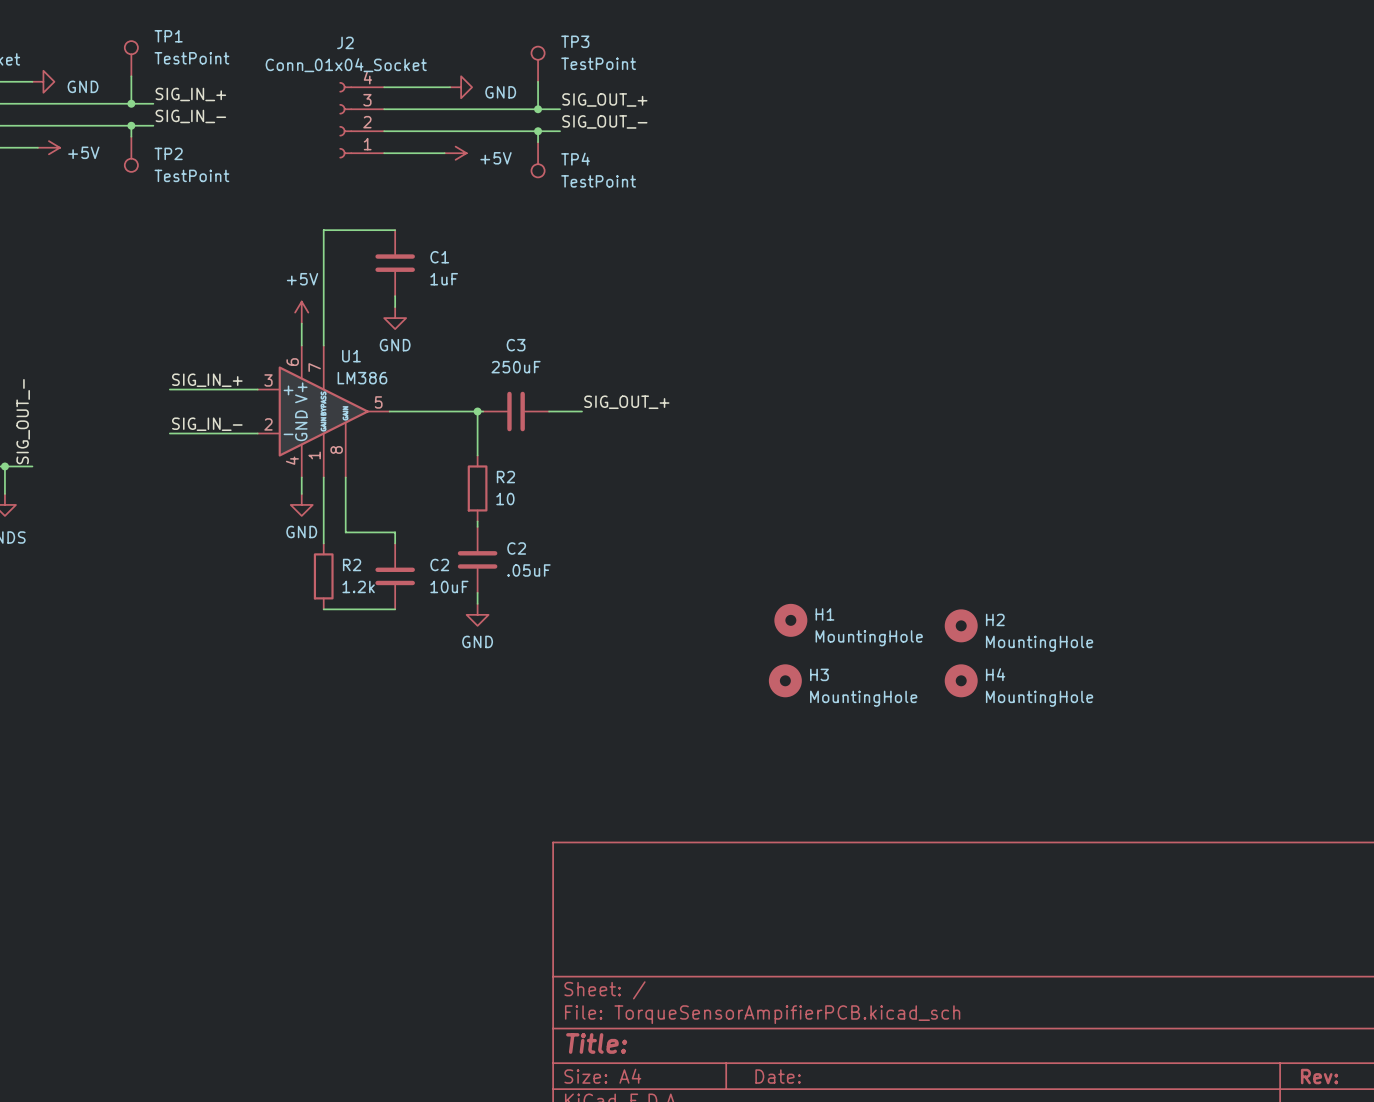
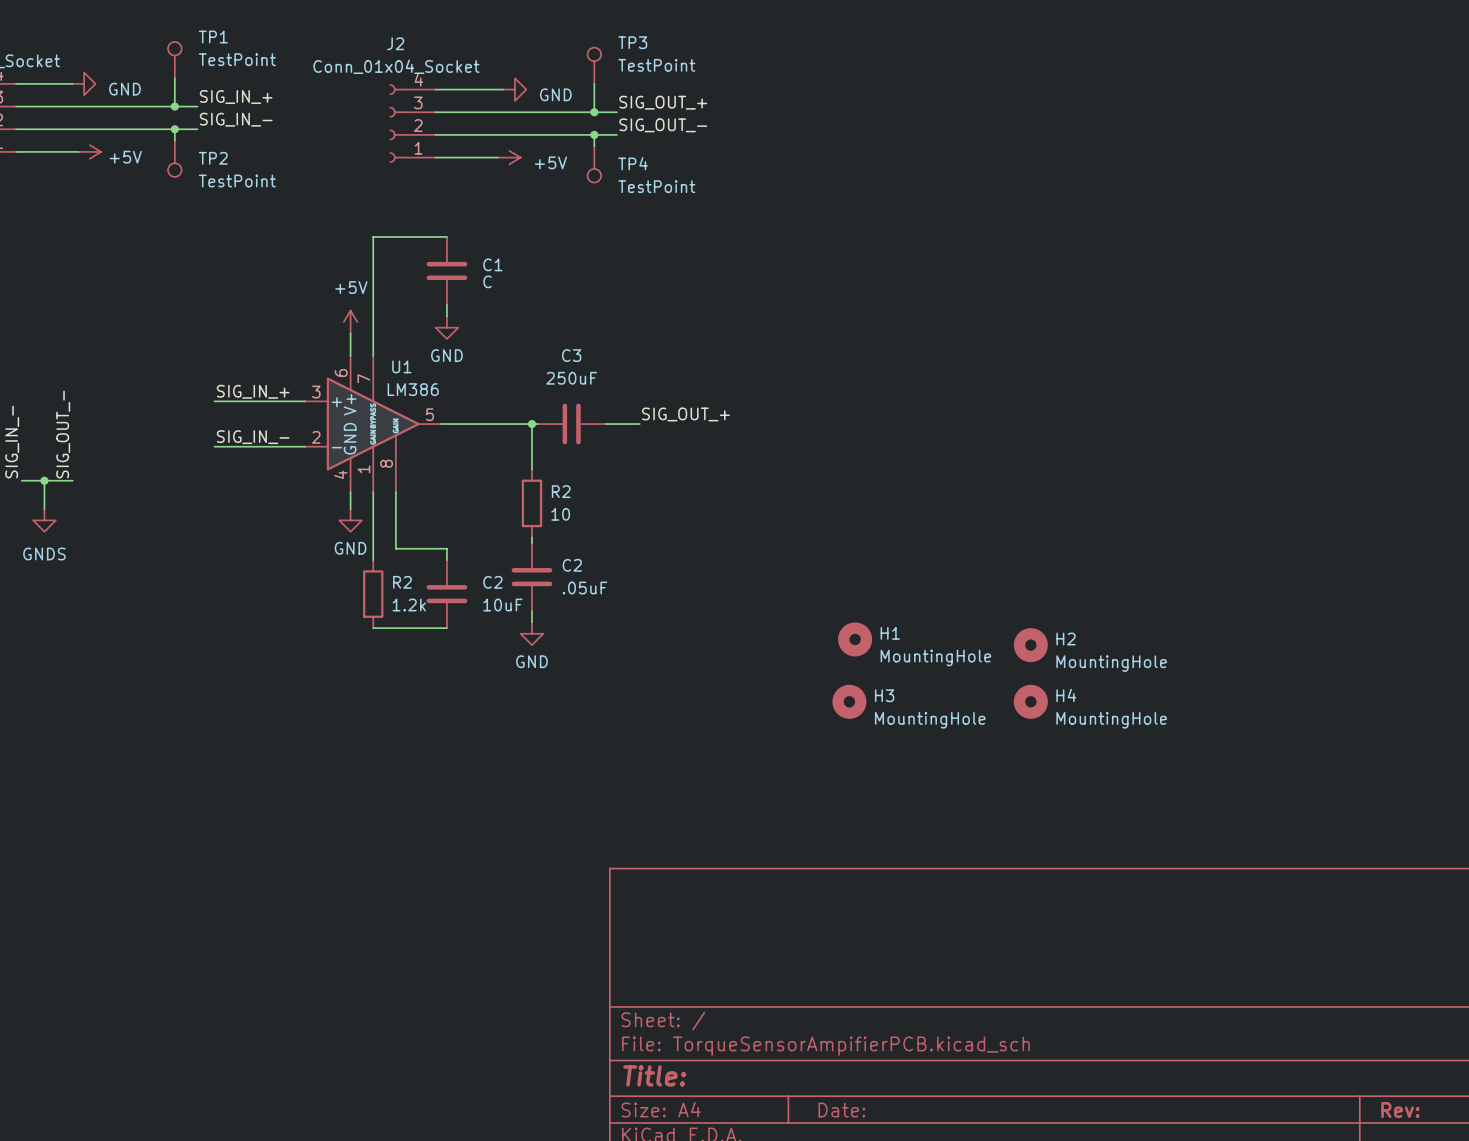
C1 value: 1uF (444, 279) -> C (487, 281)

